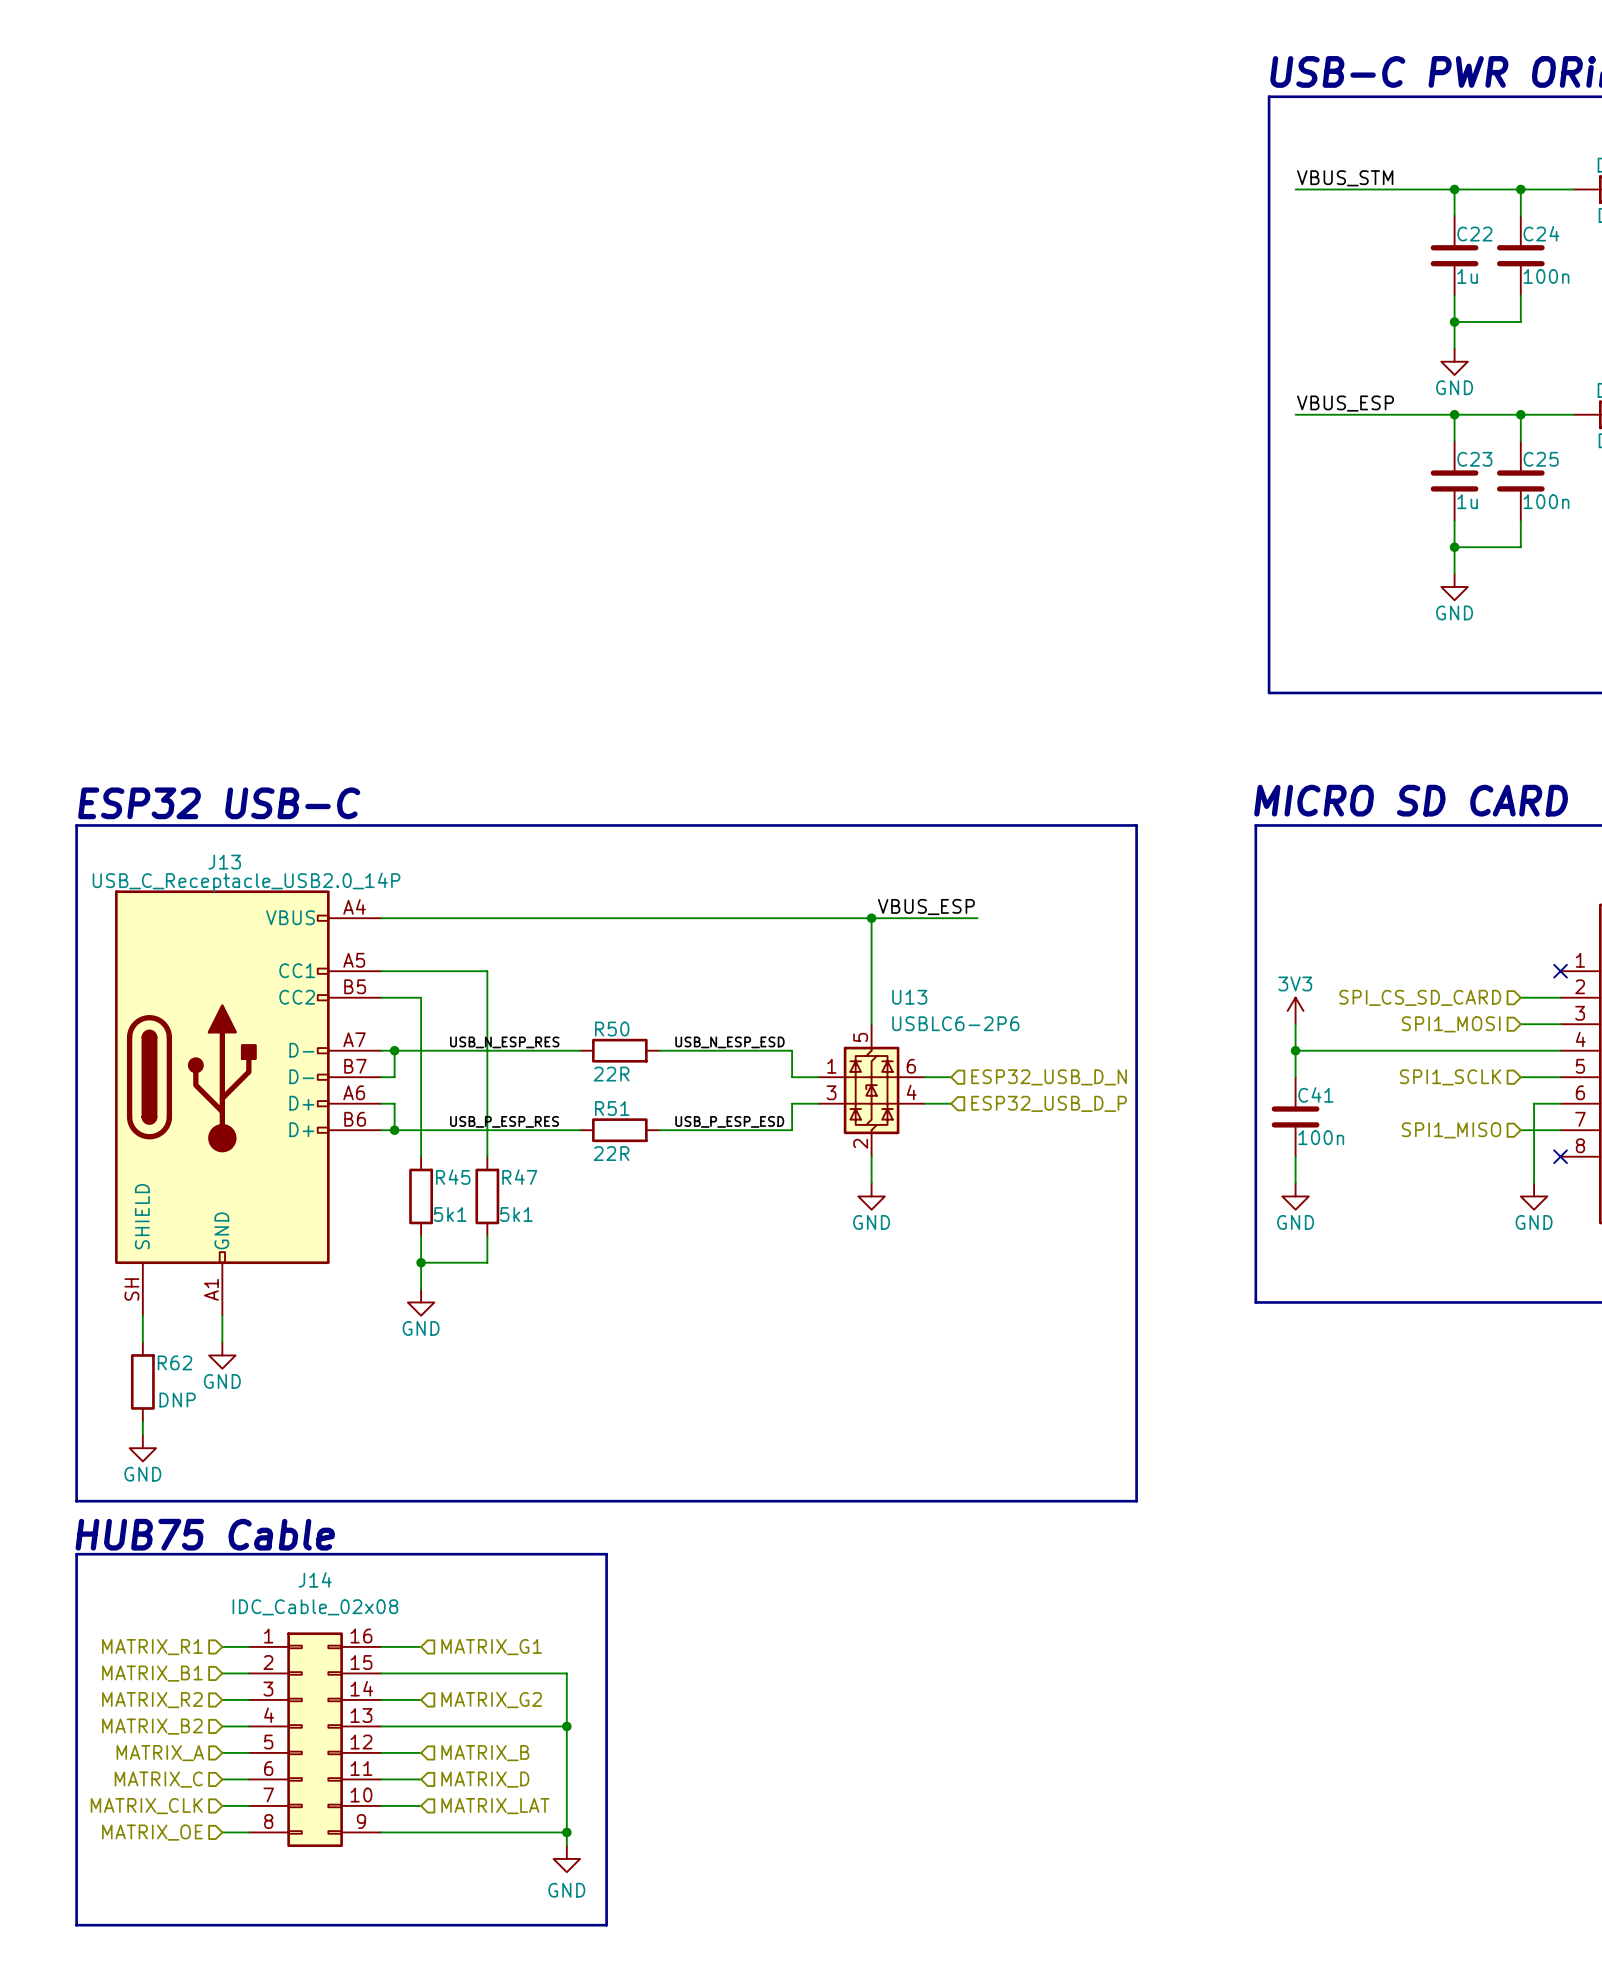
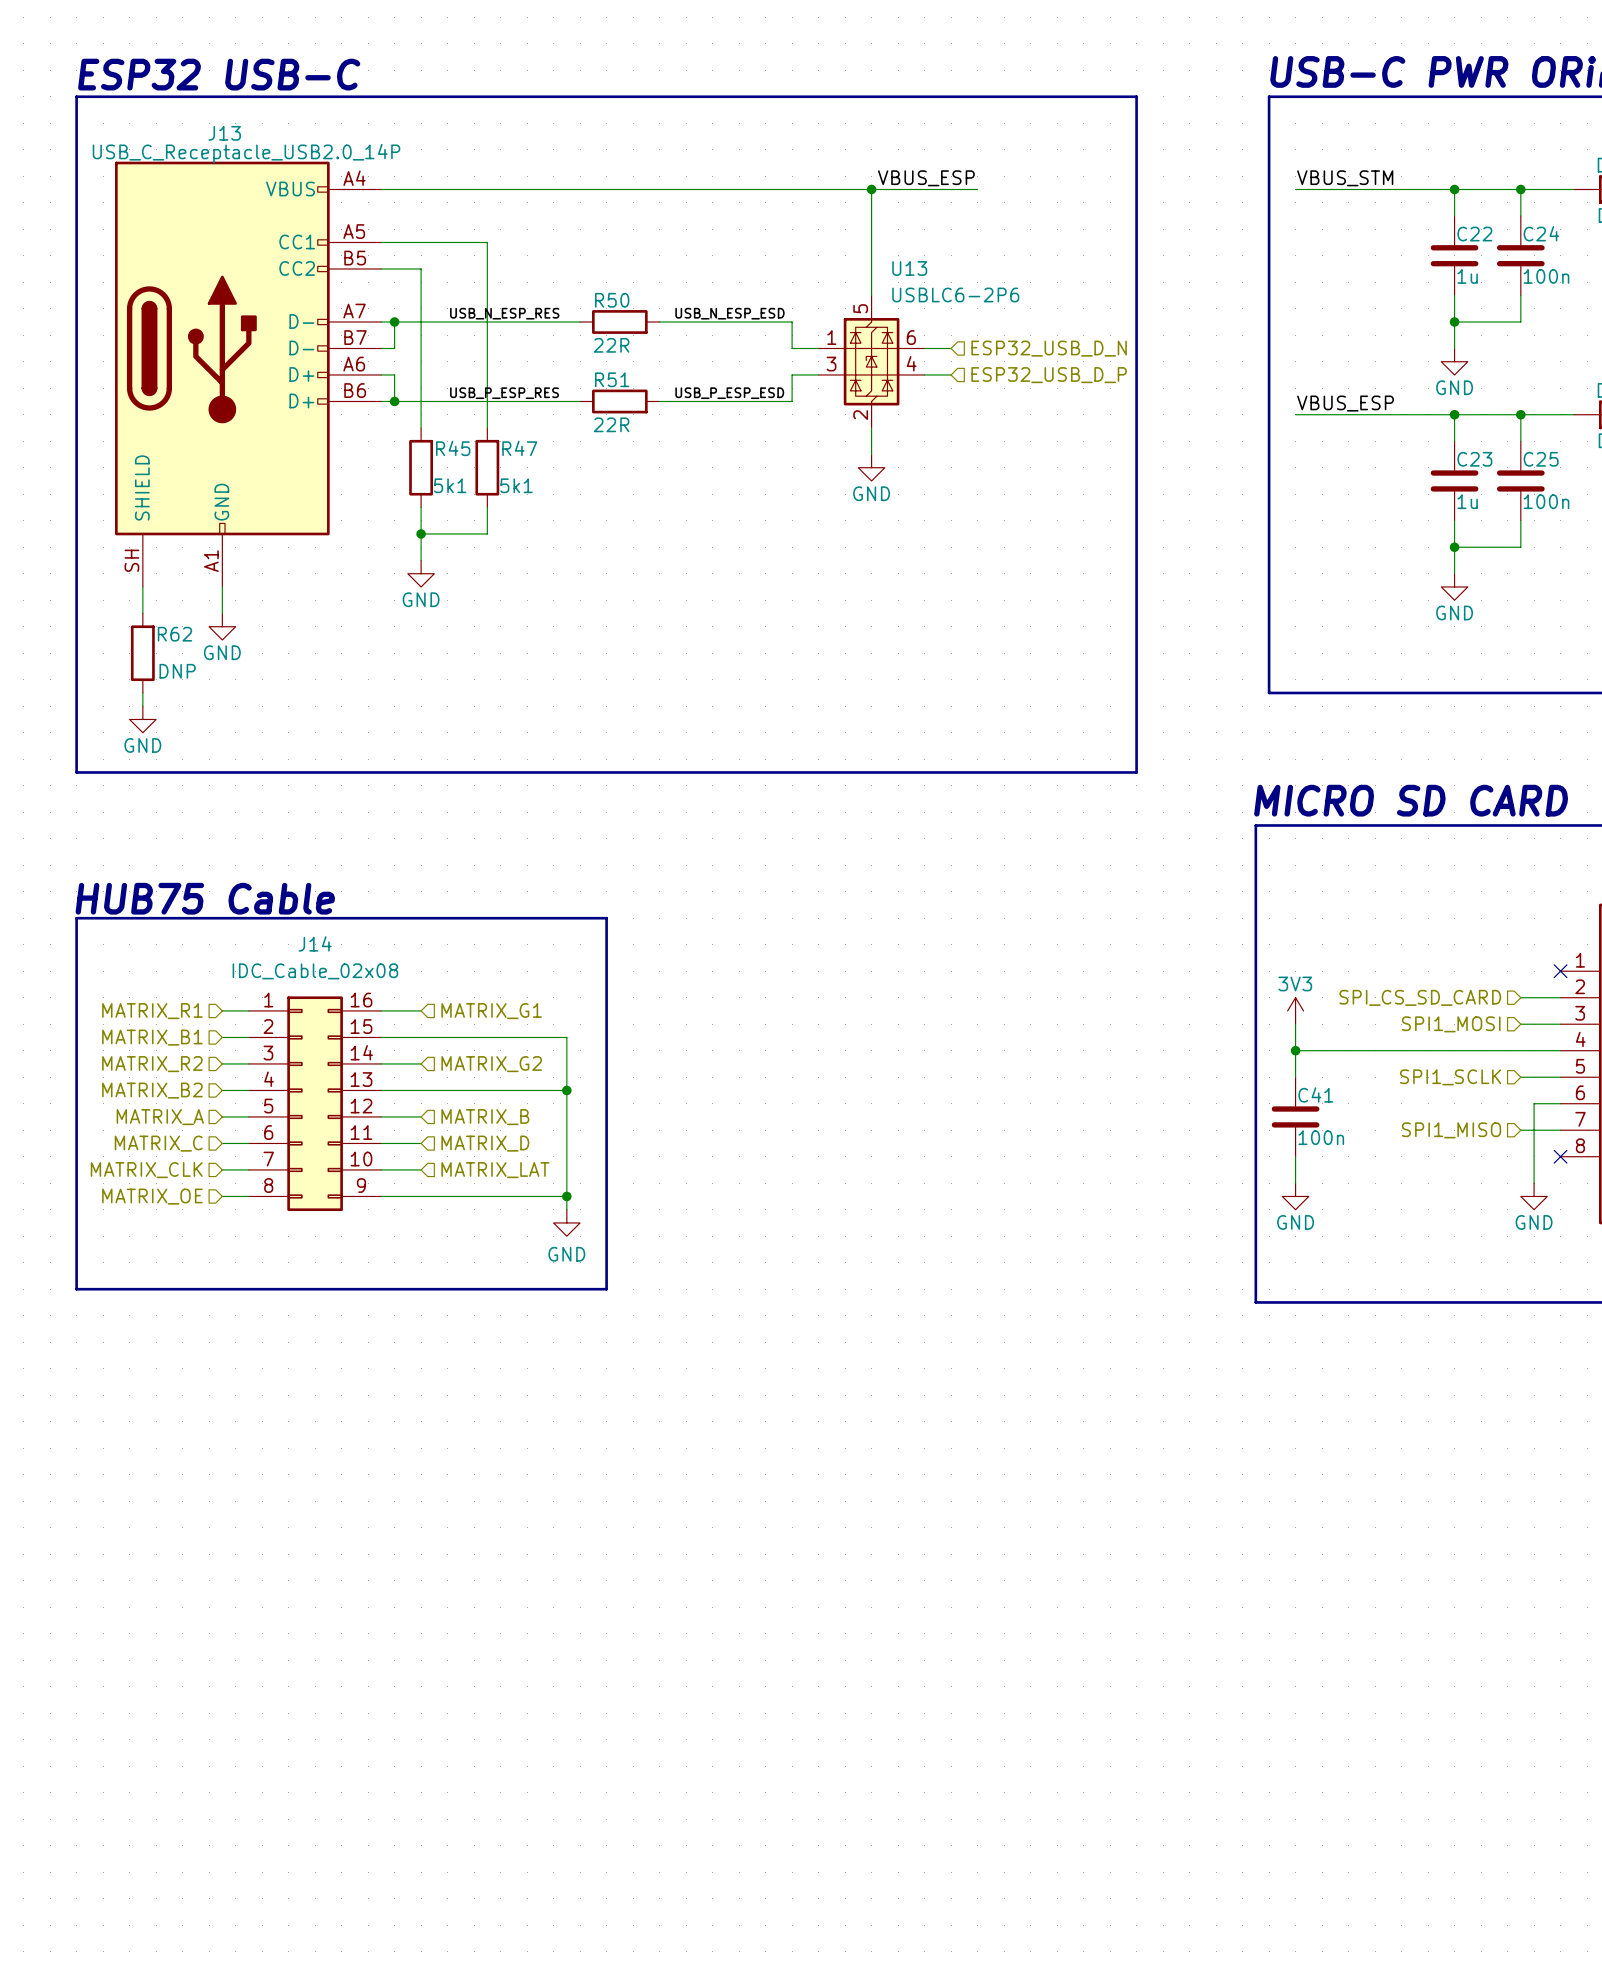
text: none -> ESP32 USB-C (219, 74)
line: none -> (76, 96) (76, 772) (1136, 772) (1136, 96) (76, 96)
label: none -> VBUS_ESP (926, 178)
wire: none -> (381, 189) (977, 189)
wire: none -> (871, 189) (871, 295)
junction: none -> (871, 189)
wire: none -> (381, 242) (487, 242) (487, 427)
wire: none -> (381, 268) (421, 268) (421, 427)
label: none -> USB_N_ESP_RES (504, 313)
label: none -> USB_N_ESP_ESD (729, 313)
wire: none -> (381, 321) (580, 321)
wire: none -> (394, 321) (394, 348) (381, 348)
junction: none -> (394, 321)
wire: none -> (659, 321) (792, 321) (792, 348) (818, 348)
wire: none -> (924, 348) (951, 348)
hierarchical label: none -> ESP32_USB_D_N (1049, 348)
wire: none -> (381, 374) (394, 374) (394, 401)
wire: none -> (818, 374) (792, 374) (792, 401) (659, 401)
wire: none -> (924, 374) (951, 374)
hierarchical label: none -> ESP32_USB_D_P (1049, 375)
label: none -> USB_P_ESP_RES (504, 393)
label: none -> USB_P_ESP_ESD (729, 393)
wire: none -> (381, 401) (580, 401)
junction: none -> (394, 401)
wire: none -> (871, 427) (871, 454)
power symbol: none -> GND (871, 467)
wire: none -> (421, 507) (421, 560)
wire: none -> (487, 507) (487, 533) (421, 533)
junction: none -> (421, 533)
power symbol: none -> GND (421, 573)
wire: none -> (142, 586) (142, 613)
wire: none -> (222, 586) (222, 613)
power symbol: none -> GND (222, 626)
wire: none -> (142, 692) (142, 706)
power symbol: none -> GND (142, 719)
text: ESP32 USB-C (219, 803) -> none
text: none -> HUB75 Cable (205, 898)
label: VBUS_ESP (926, 907) -> none
line: (76, 918) (76, 825) (1136, 825) (1136, 1501) (76, 1501) (76, 1289) -> (76, 918) (606, 918) (606, 1289) (76, 1289)
wire: (381, 918) (977, 918) -> none
wire: (871, 918) (871, 1024) -> none
junction: (871, 918) -> none
wire: (381, 971) (487, 971) (487, 1156) -> none
wire: (381, 997) (421, 997) (421, 1156) -> none
wire: none -> (381, 1010) (421, 1010)
hierarchical label: none -> MATRIX_R1 (152, 1011)
hierarchical label: none -> MATRIX_G1 (491, 1011)
hierarchical label: none -> MATRIX_B1 (152, 1037)
wire: none -> (381, 1037) (566, 1037) (566, 1209)
label: USB_N_ESP_RES (504, 1042) -> none
label: USB_N_ESP_ESD (729, 1042) -> none
wire: (381, 1050) (580, 1050) -> none
wire: (394, 1050) (394, 1077) (381, 1077) -> none
junction: (394, 1050) -> none
R50 position: (619, 1050) -> (619, 321)
wire: (659, 1050) (792, 1050) (792, 1077) (818, 1077) -> none
wire: none -> (381, 1063) (421, 1063)
hierarchical label: none -> MATRIX_R2 (152, 1064)
hierarchical label: none -> MATRIX_G2 (491, 1064)
wire: (924, 1077) (951, 1077) -> none
hierarchical label: ESP32_USB_D_N (1049, 1077) -> none
hierarchical label: none -> MATRIX_B2 (152, 1090)
wire: none -> (381, 1090) (566, 1090)
junction: none -> (566, 1090)
U13 position: (871, 1090) -> (871, 361)
J13 position: (248, 1103) -> (248, 374)
wire: (381, 1103) (394, 1103) (394, 1130) -> none
wire: (818, 1103) (792, 1103) (792, 1130) (659, 1130) -> none
wire: (924, 1103) (951, 1103) -> none
hierarchical label: ESP32_USB_D_P (1049, 1103) -> none
wire: none -> (381, 1116) (421, 1116)
hierarchical label: none -> MATRIX_A (160, 1117)
hierarchical label: none -> MATRIX_B (485, 1117)
label: USB_P_ESP_RES (504, 1121) -> none
label: USB_P_ESP_ESD (729, 1121) -> none
wire: (381, 1130) (580, 1130) -> none
junction: (394, 1130) -> none
R51 position: (619, 1130) -> (619, 401)
hierarchical label: none -> MATRIX_C (158, 1143)
wire: none -> (381, 1143) (421, 1143)
hierarchical label: none -> MATRIX_D (485, 1143)
wire: (871, 1156) (871, 1183) -> none
wire: none -> (381, 1169) (421, 1169)
hierarchical label: none -> MATRIX_CLK (146, 1170)
hierarchical label: none -> MATRIX_LAT (495, 1170)
hierarchical label: none -> MATRIX_OE (152, 1196)
wire: none -> (381, 1196) (566, 1196)
R45 position: (421, 1196) -> (421, 467)
R47 position: (487, 1196) -> (487, 467)
junction: none -> (566, 1196)
power symbol: GND (871, 1196) -> none
power symbol: none -> GND (566, 1222)
wire: (421, 1236) (421, 1289) -> none
wire: (487, 1236) (487, 1262) (421, 1262) -> none
junction: (421, 1262) -> none
power symbol: GND (421, 1302) -> none
wire: (142, 1315) (142, 1342) -> none
wire: (222, 1315) (222, 1342) -> none
power symbol: GND (222, 1355) -> none
R62 position: (142, 1381) -> (142, 653)
wire: (142, 1421) (142, 1434) -> none
power symbol: GND (142, 1448) -> none
text: HUB75 Cable (205, 1534) -> none
line: (76, 1554) (606, 1554) (606, 1925) (76, 1925) (76, 1554) -> none
wire: (222, 1646) (248, 1646) -> none
wire: (381, 1646) (421, 1646) -> none
hierarchical label: MATRIX_R1 (152, 1647) -> none
hierarchical label: MATRIX_G1 (491, 1647) -> none
hierarchical label: MATRIX_B1 (152, 1673) -> none
wire: (222, 1673) (248, 1673) -> none
wire: (381, 1673) (566, 1673) (566, 1845) -> none
wire: (222, 1699) (248, 1699) -> none
wire: (381, 1699) (421, 1699) -> none
hierarchical label: MATRIX_R2 (152, 1700) -> none
hierarchical label: MATRIX_G2 (491, 1700) -> none
hierarchical label: MATRIX_B2 (152, 1726) -> none
wire: (222, 1726) (248, 1726) -> none
wire: (381, 1726) (566, 1726) -> none
junction: (566, 1726) -> none
J14 position: (315, 1739) -> (315, 1103)
wire: (222, 1752) (248, 1752) -> none
wire: (381, 1752) (421, 1752) -> none
hierarchical label: MATRIX_A (160, 1753) -> none
hierarchical label: MATRIX_B (485, 1753) -> none
hierarchical label: MATRIX_C (158, 1779) -> none
wire: (222, 1779) (248, 1779) -> none
wire: (381, 1779) (421, 1779) -> none
hierarchical label: MATRIX_D (485, 1779) -> none
wire: (222, 1805) (248, 1805) -> none
wire: (381, 1805) (421, 1805) -> none
hierarchical label: MATRIX_CLK (146, 1806) -> none
hierarchical label: MATRIX_LAT (495, 1806) -> none
hierarchical label: MATRIX_OE (152, 1832) -> none
wire: (222, 1832) (248, 1832) -> none
wire: (381, 1832) (566, 1832) -> none
junction: (566, 1832) -> none
power symbol: GND (566, 1858) -> none

